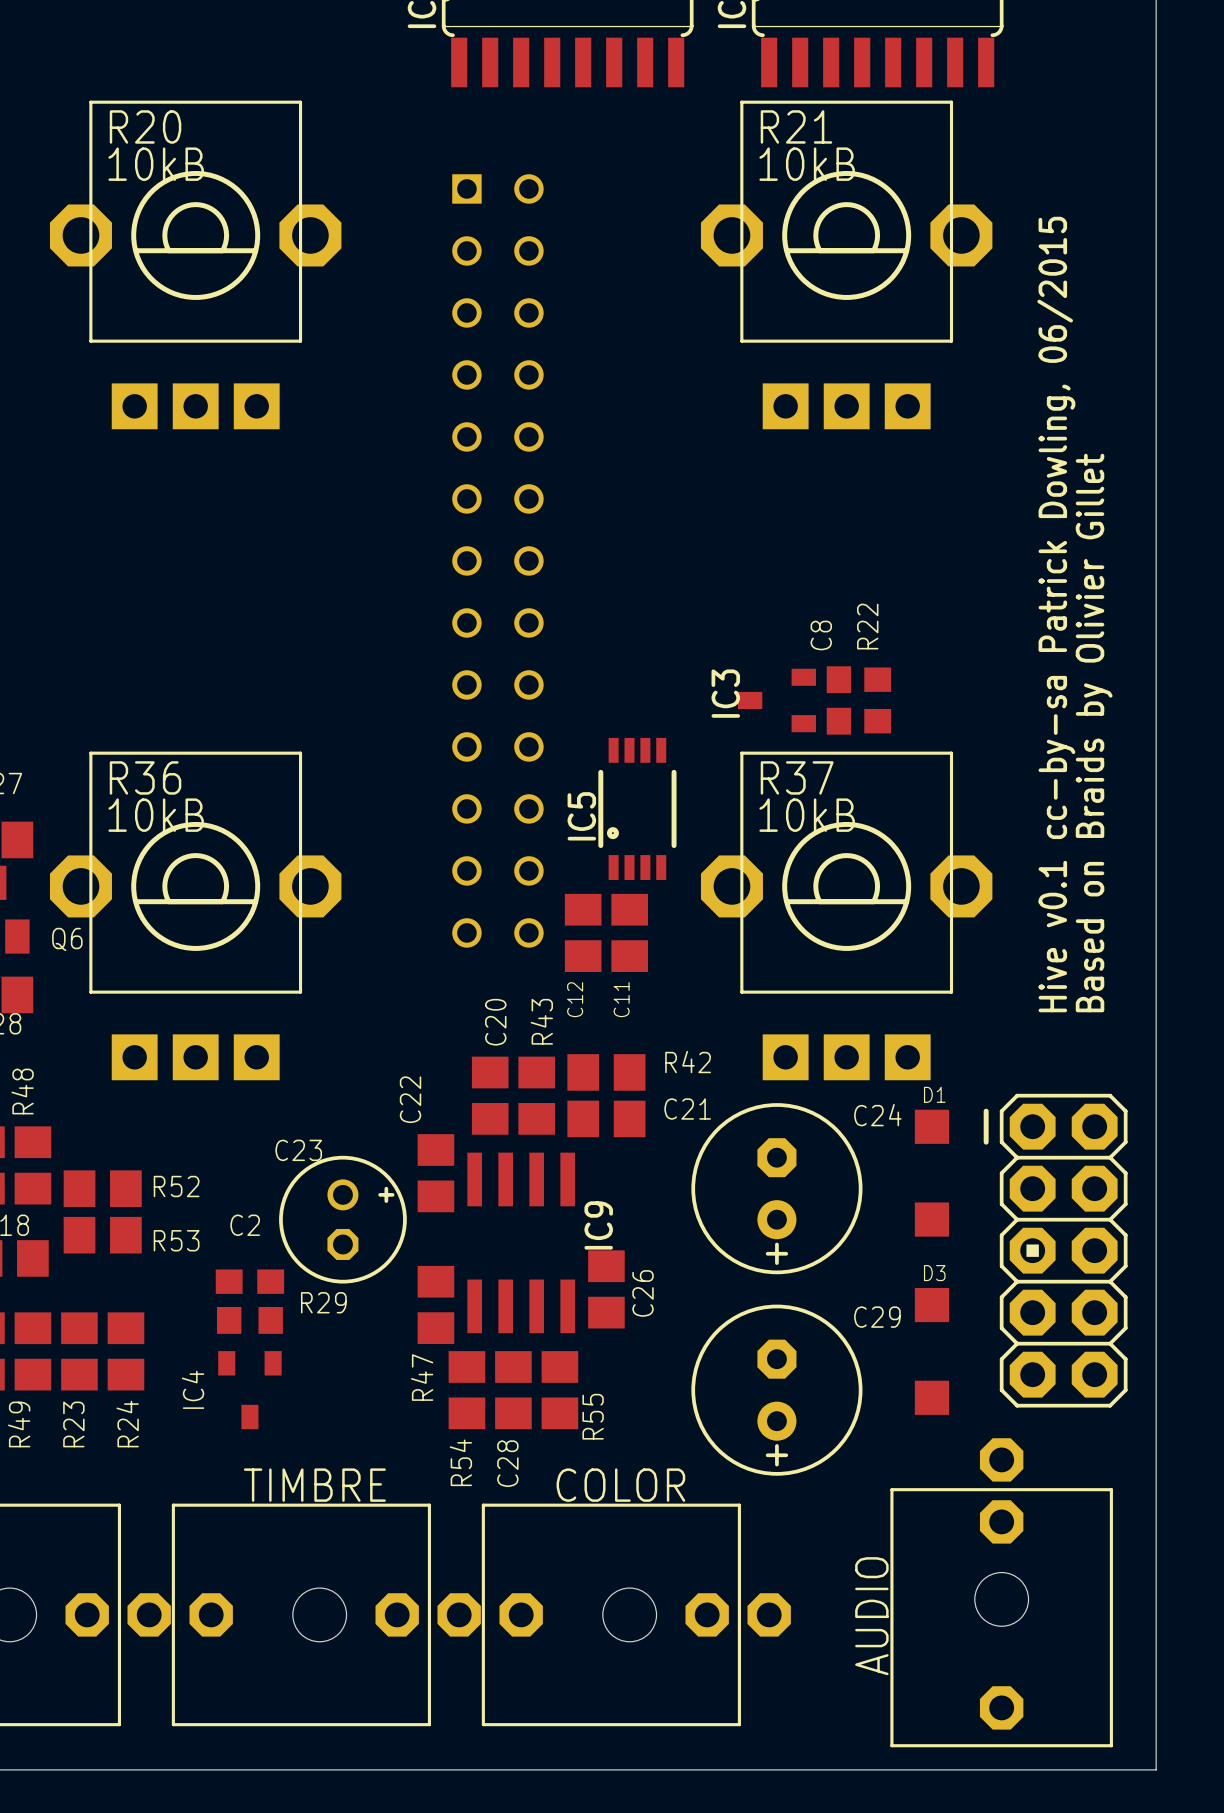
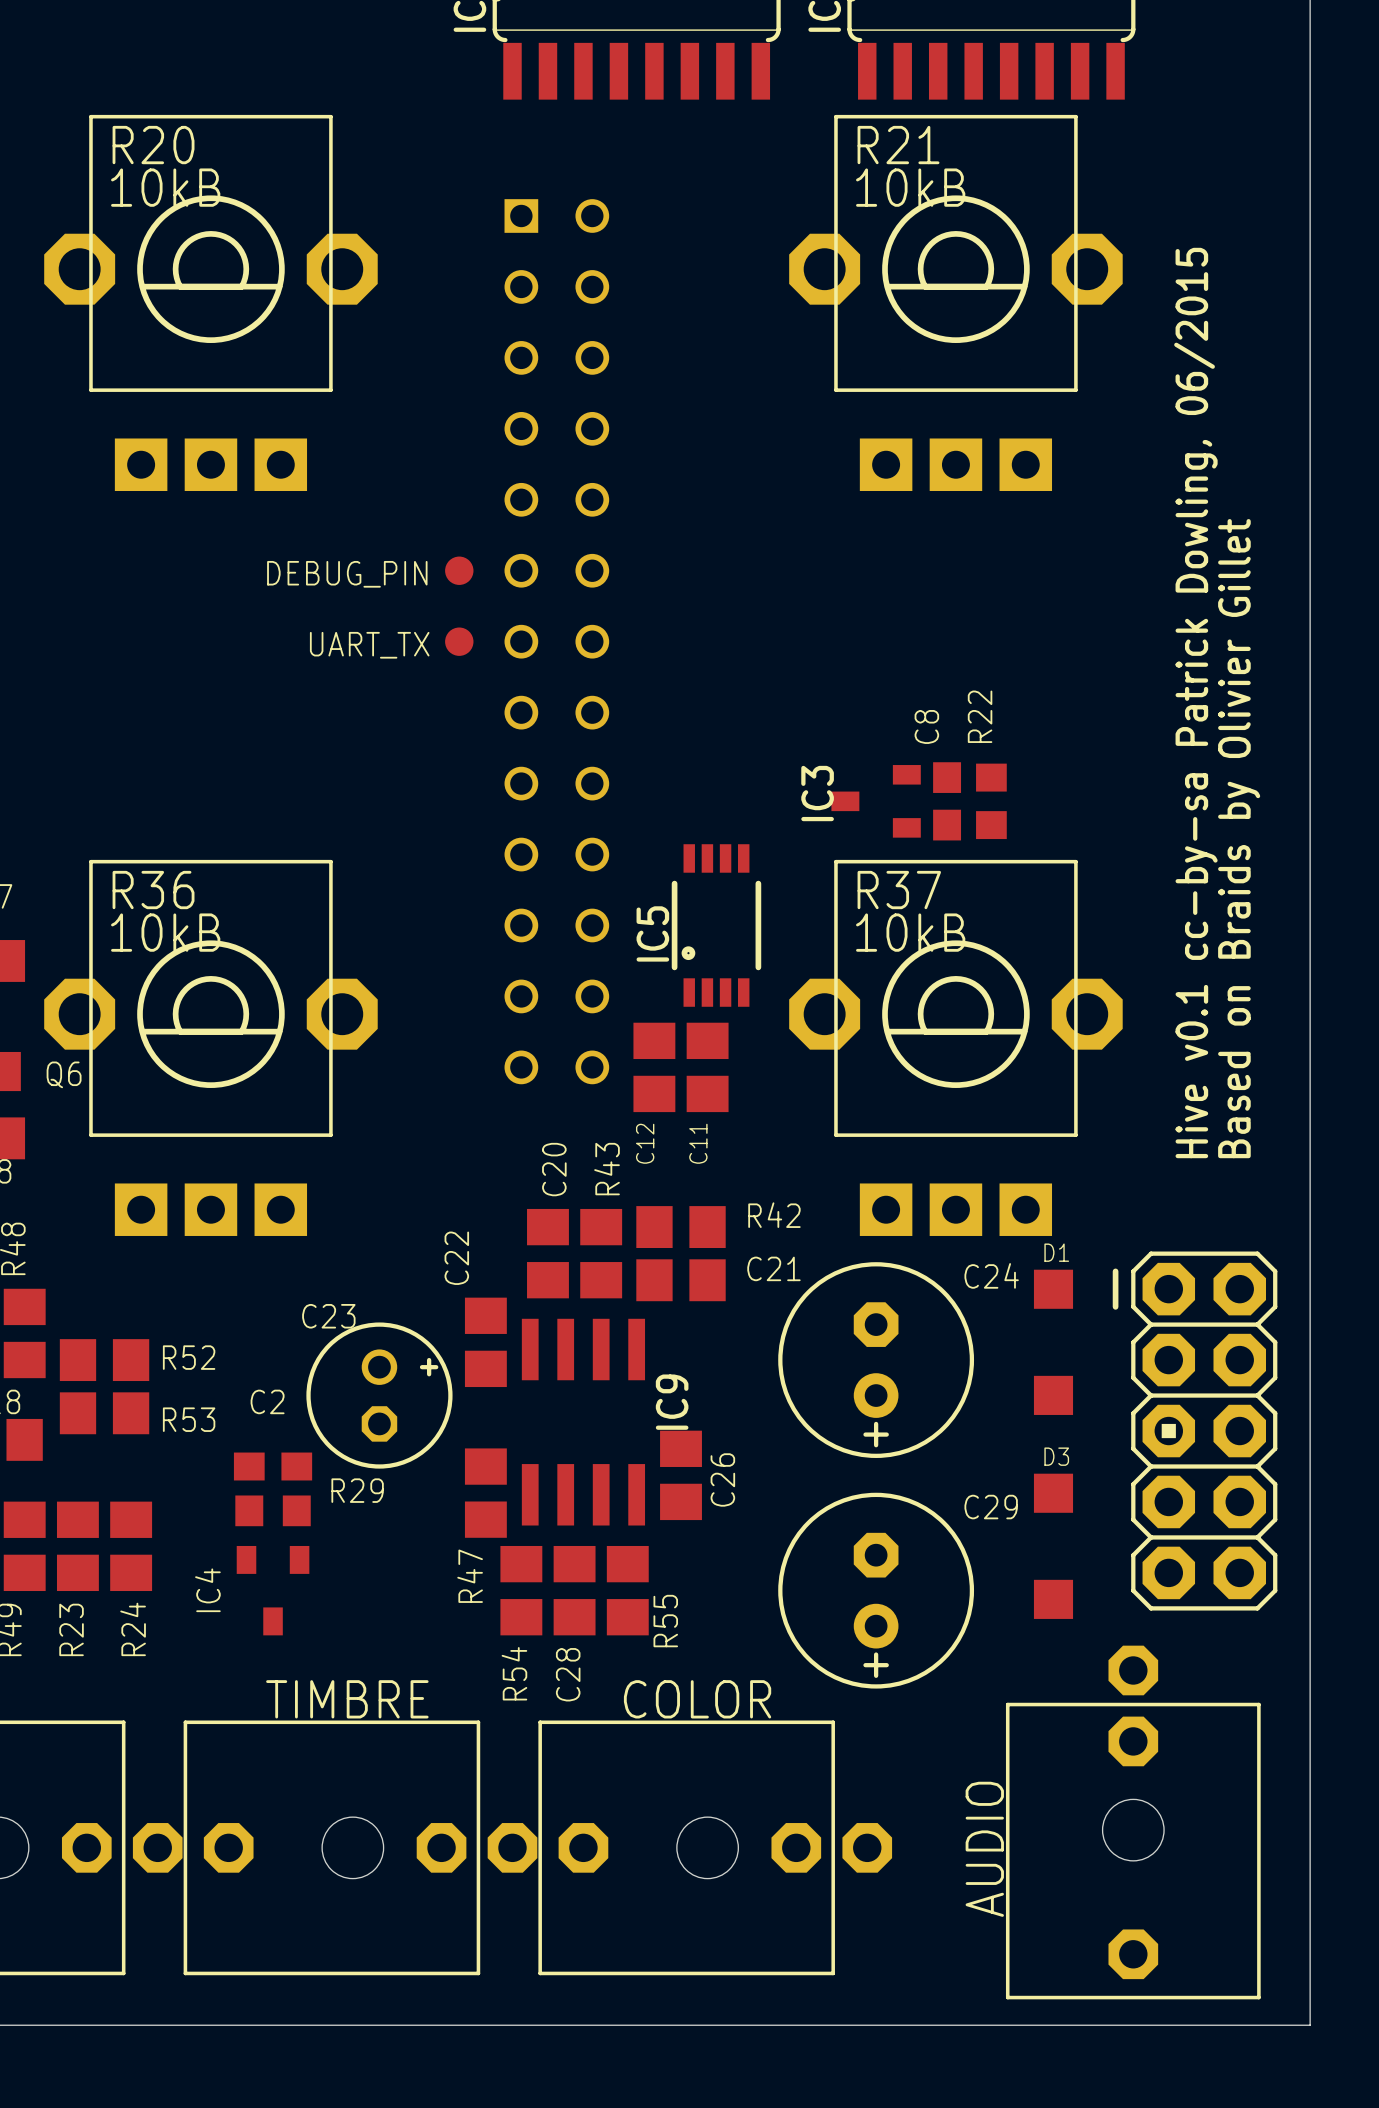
part: none -> (459, 570)
text: none -> DEBUG_PIN (347, 574)
part: none -> (459, 641)
text: none -> UART_TX (369, 645)

